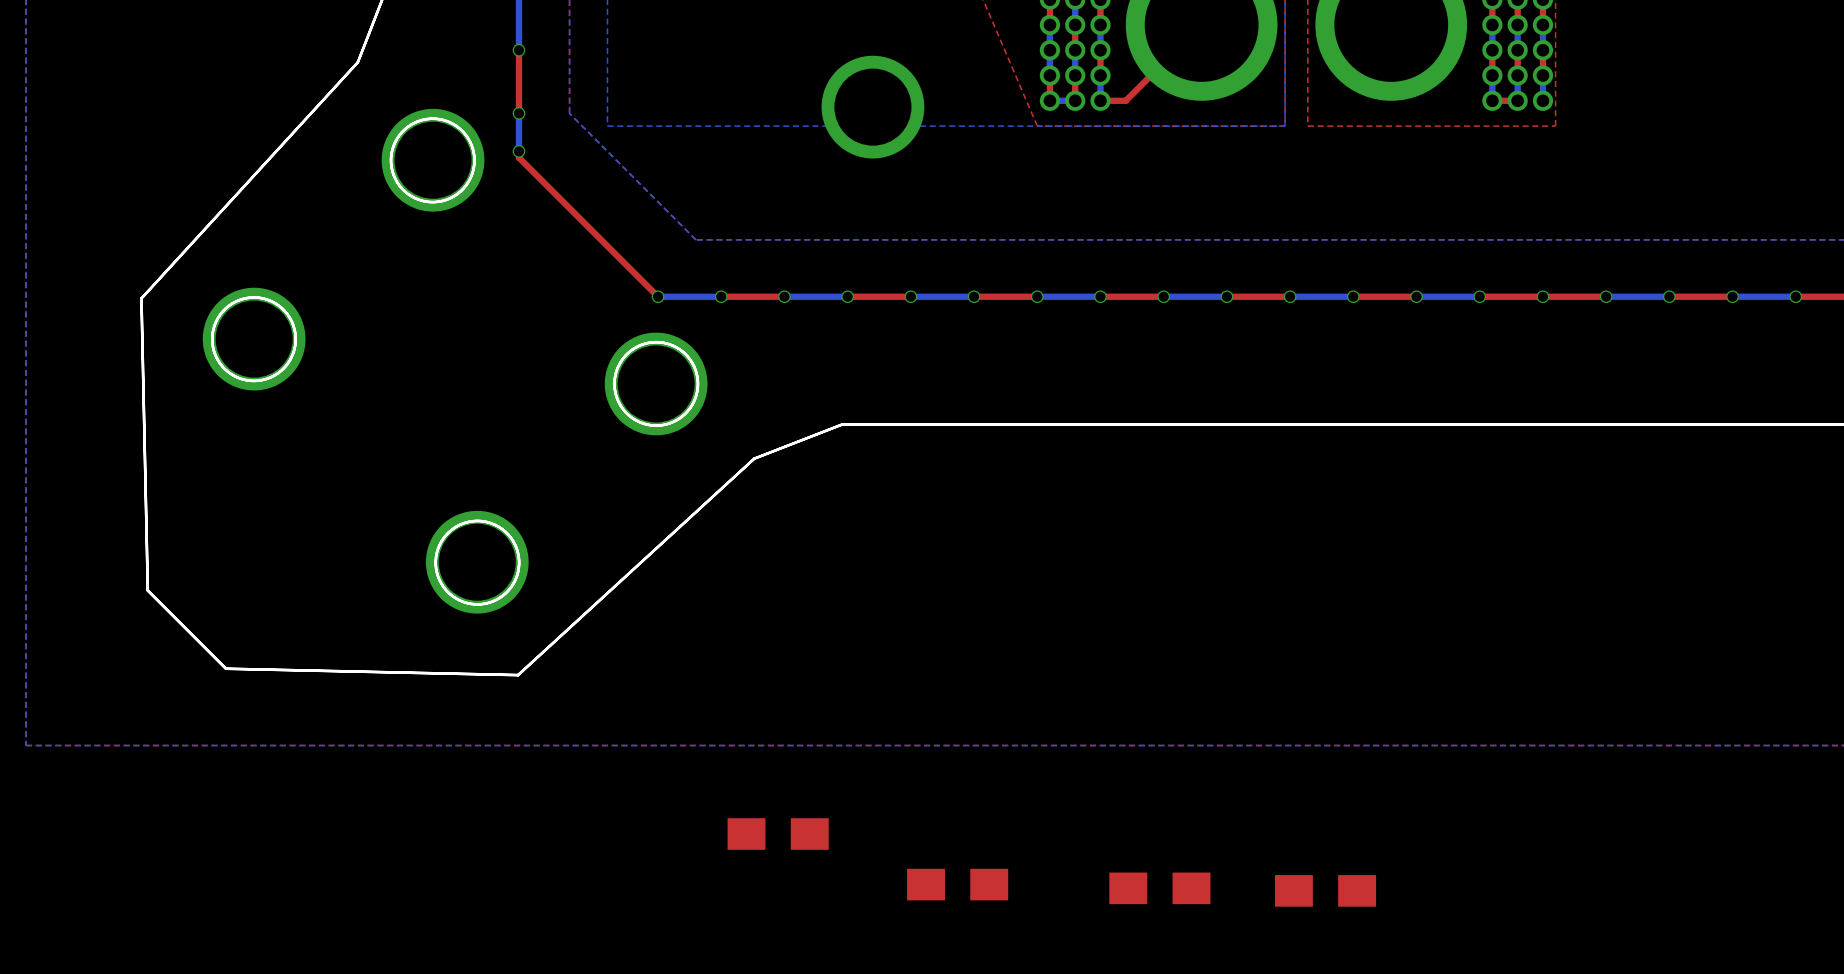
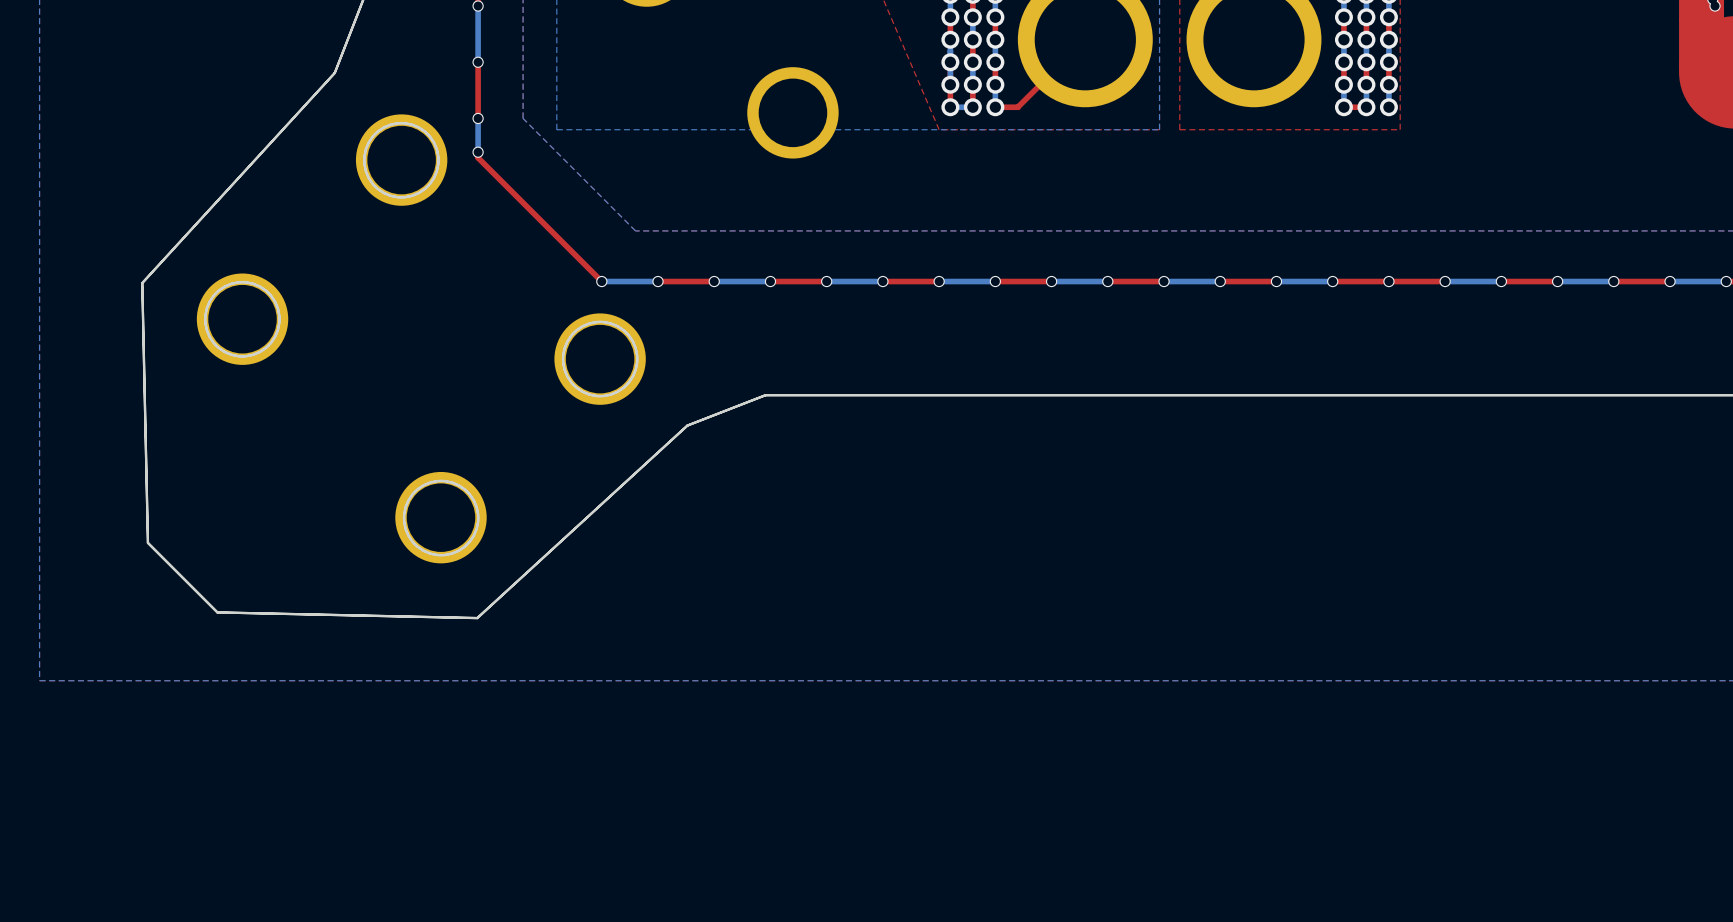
part: (778, 834) -> none
part: (957, 884) -> none
part: (1159, 888) -> none
part: (1325, 890) -> none

